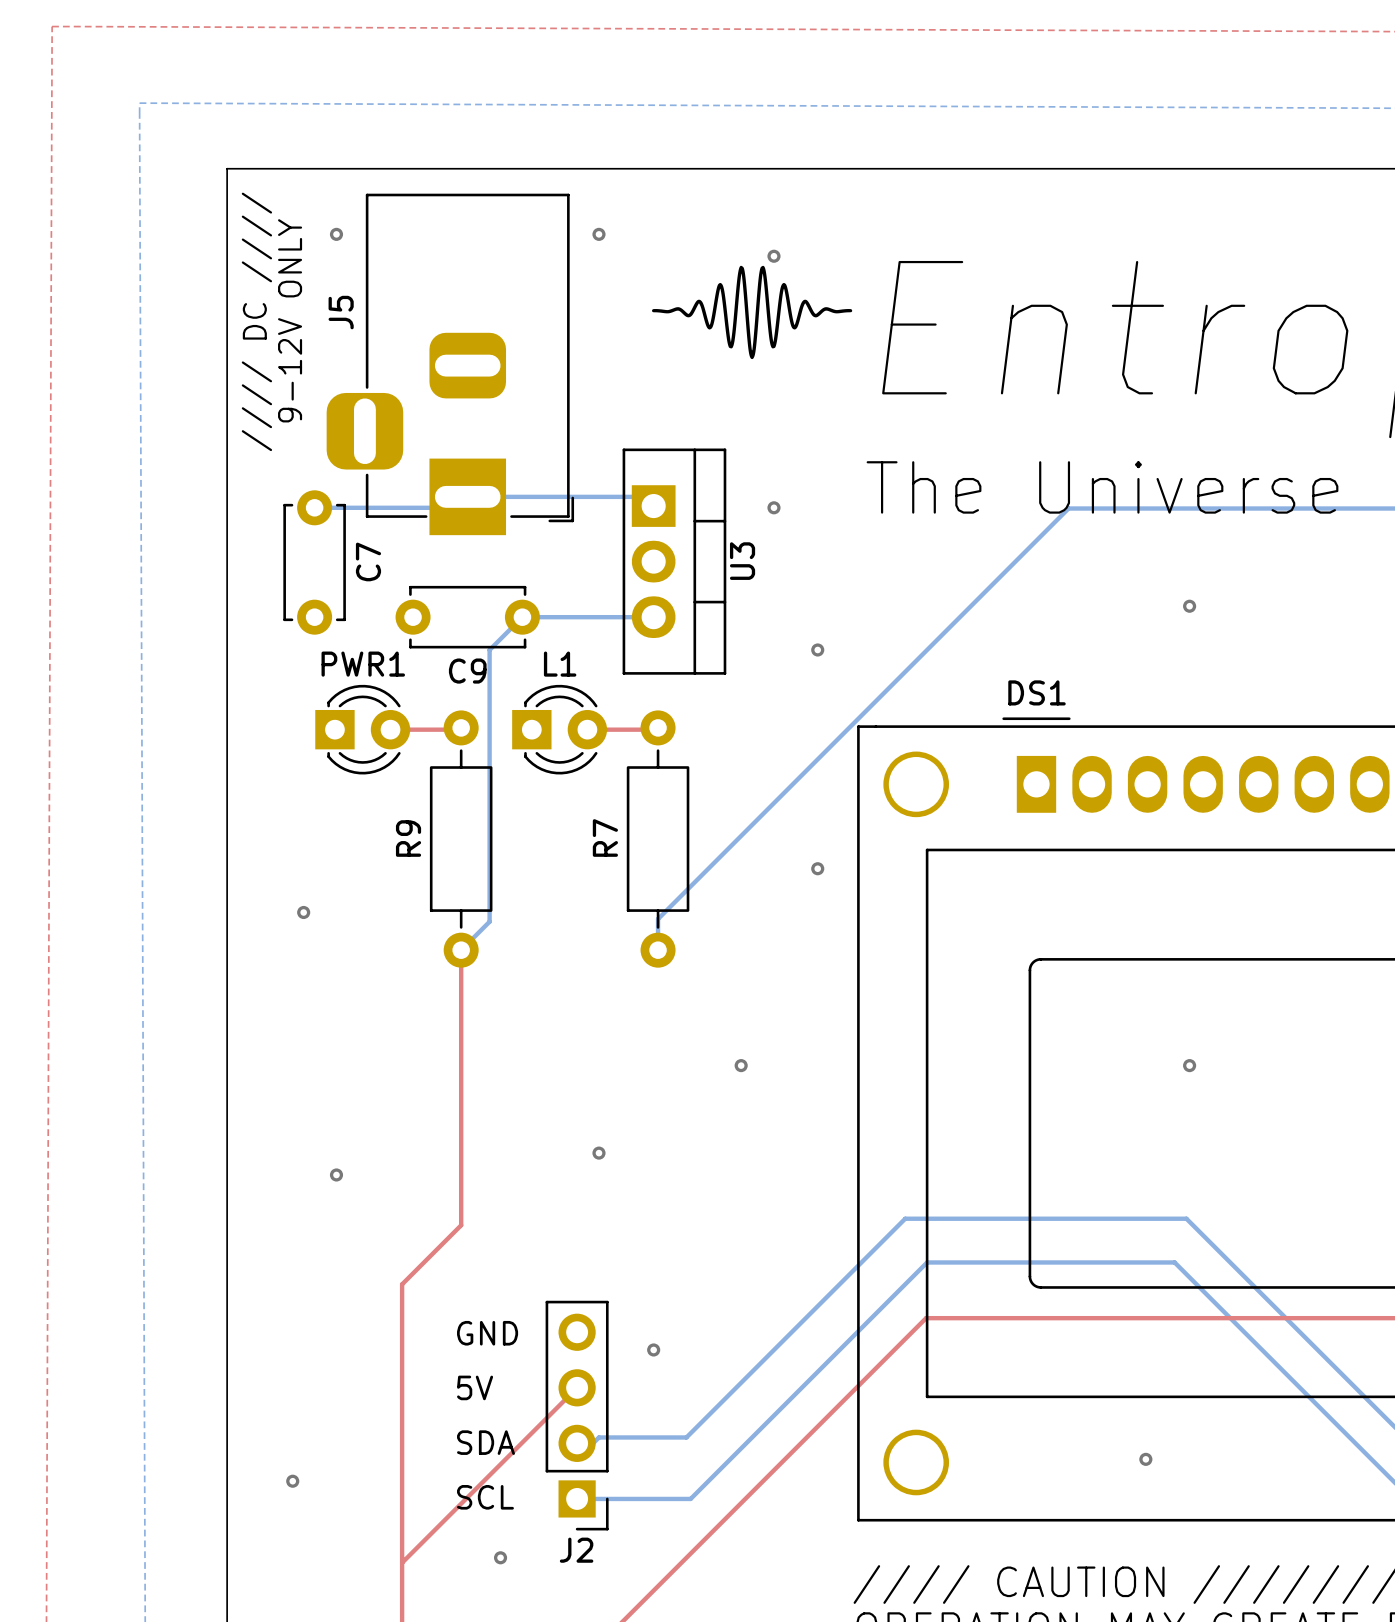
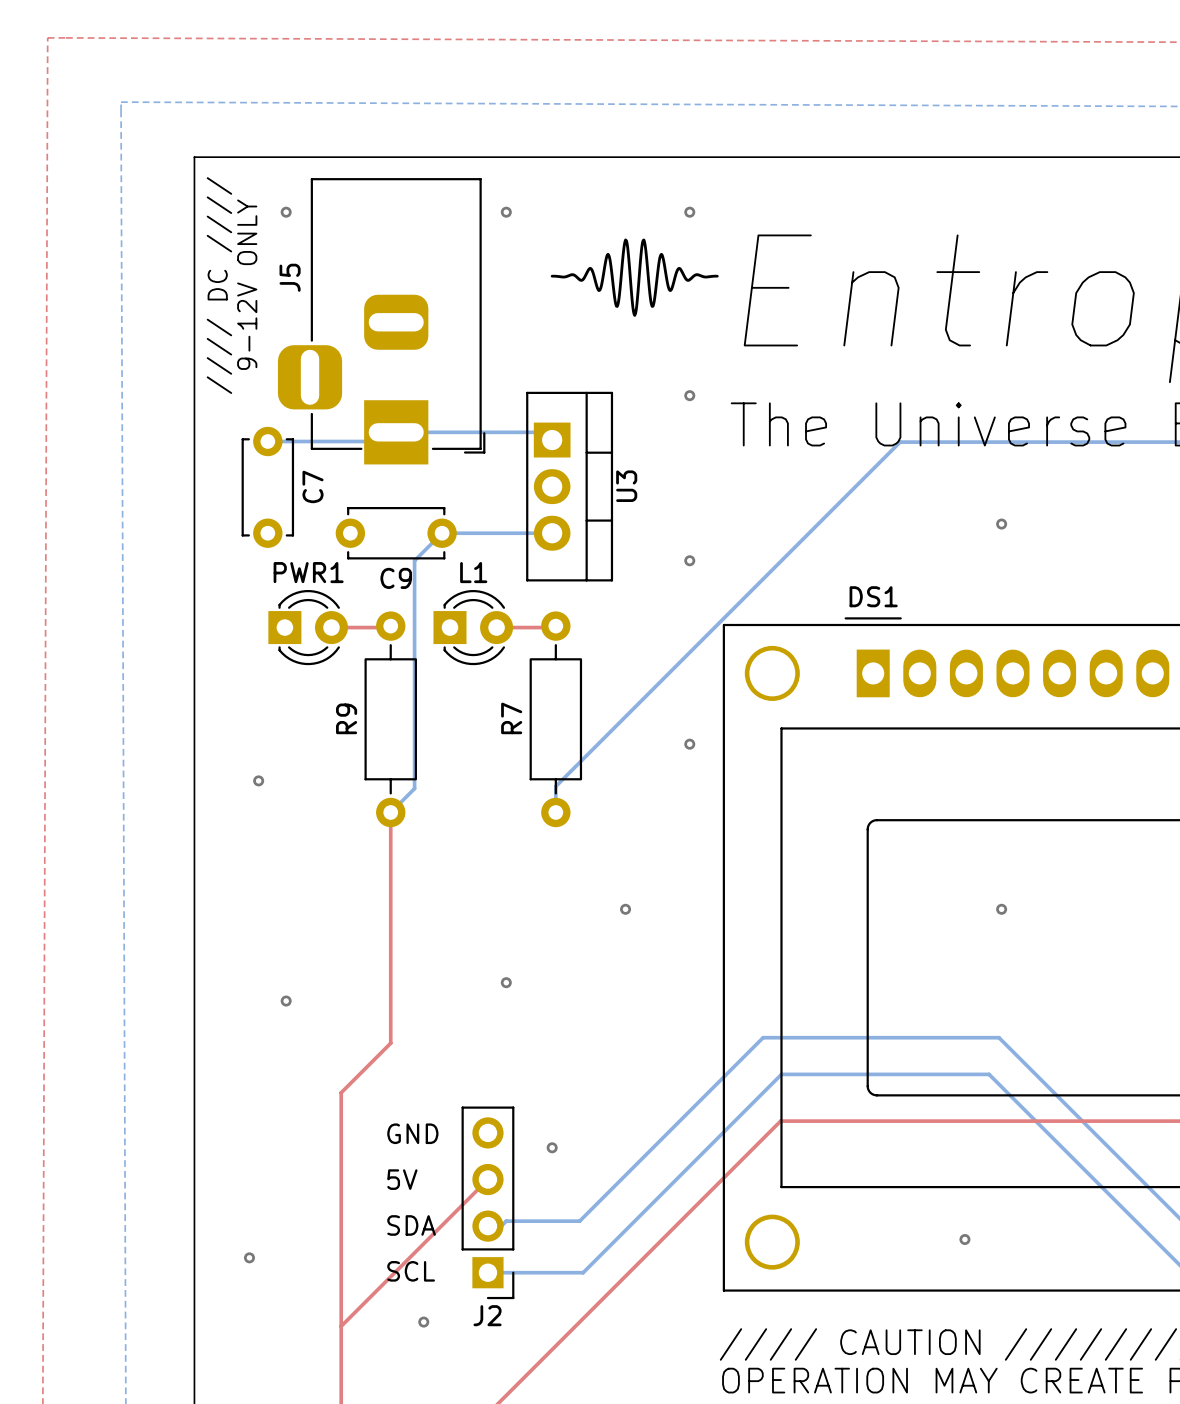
via position: (773, 256) -> (689, 212)
via position: (773, 507) -> (689, 395)

